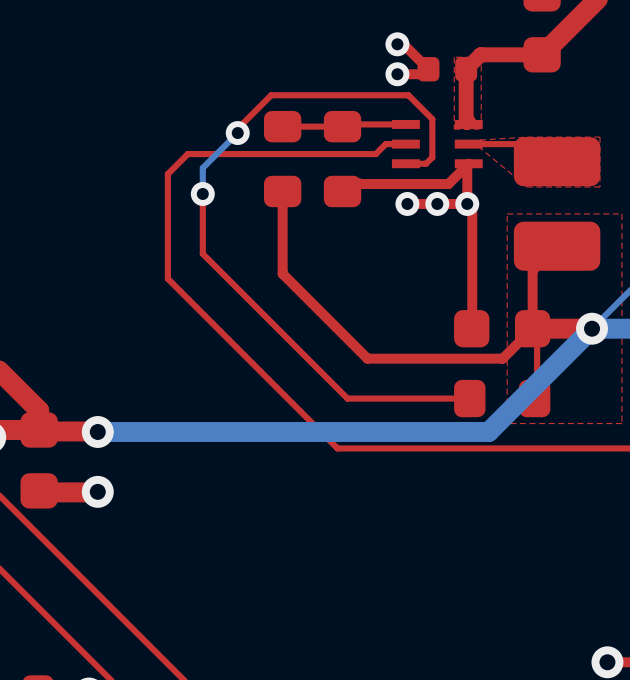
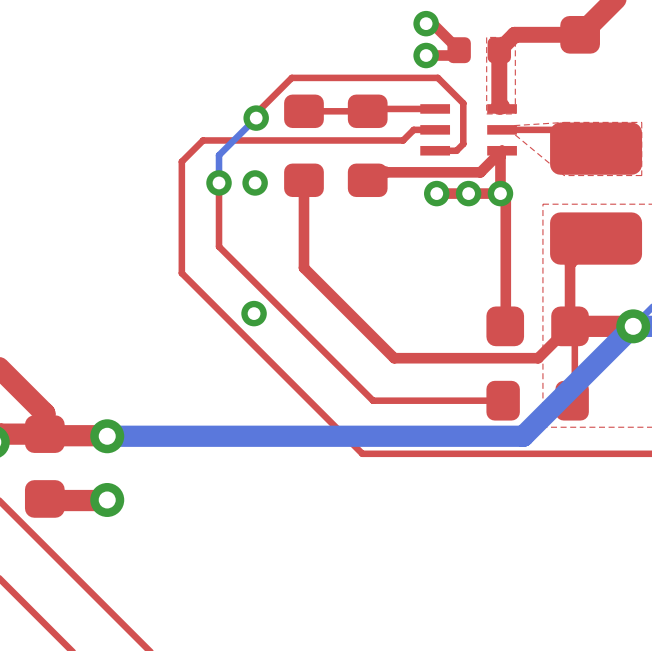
via: none -> (255, 182)
via: none -> (254, 313)

